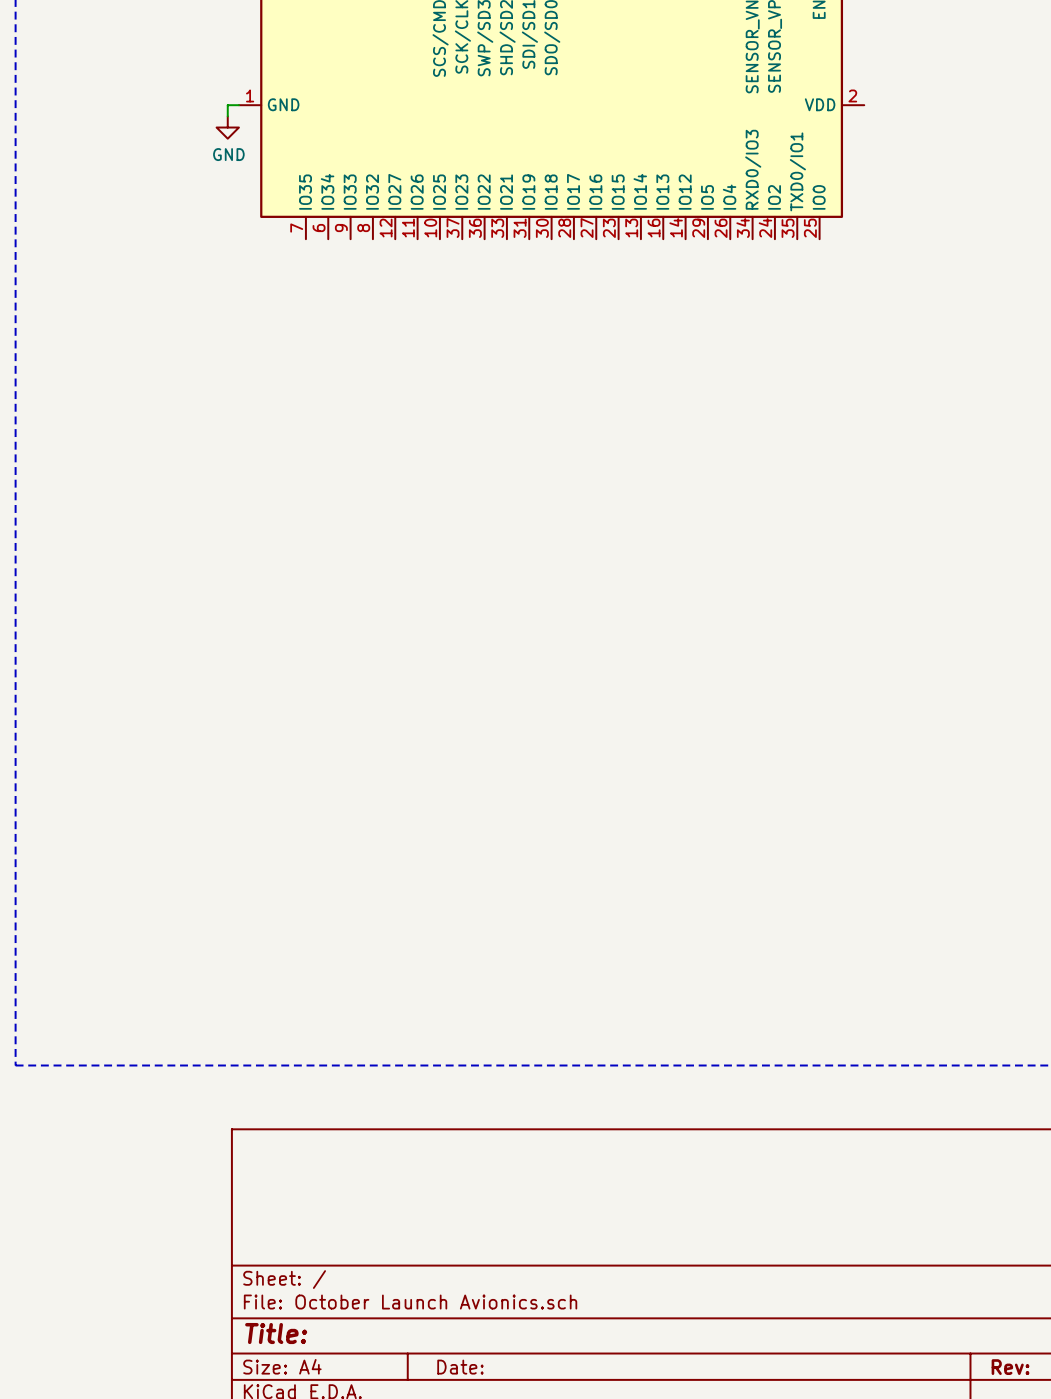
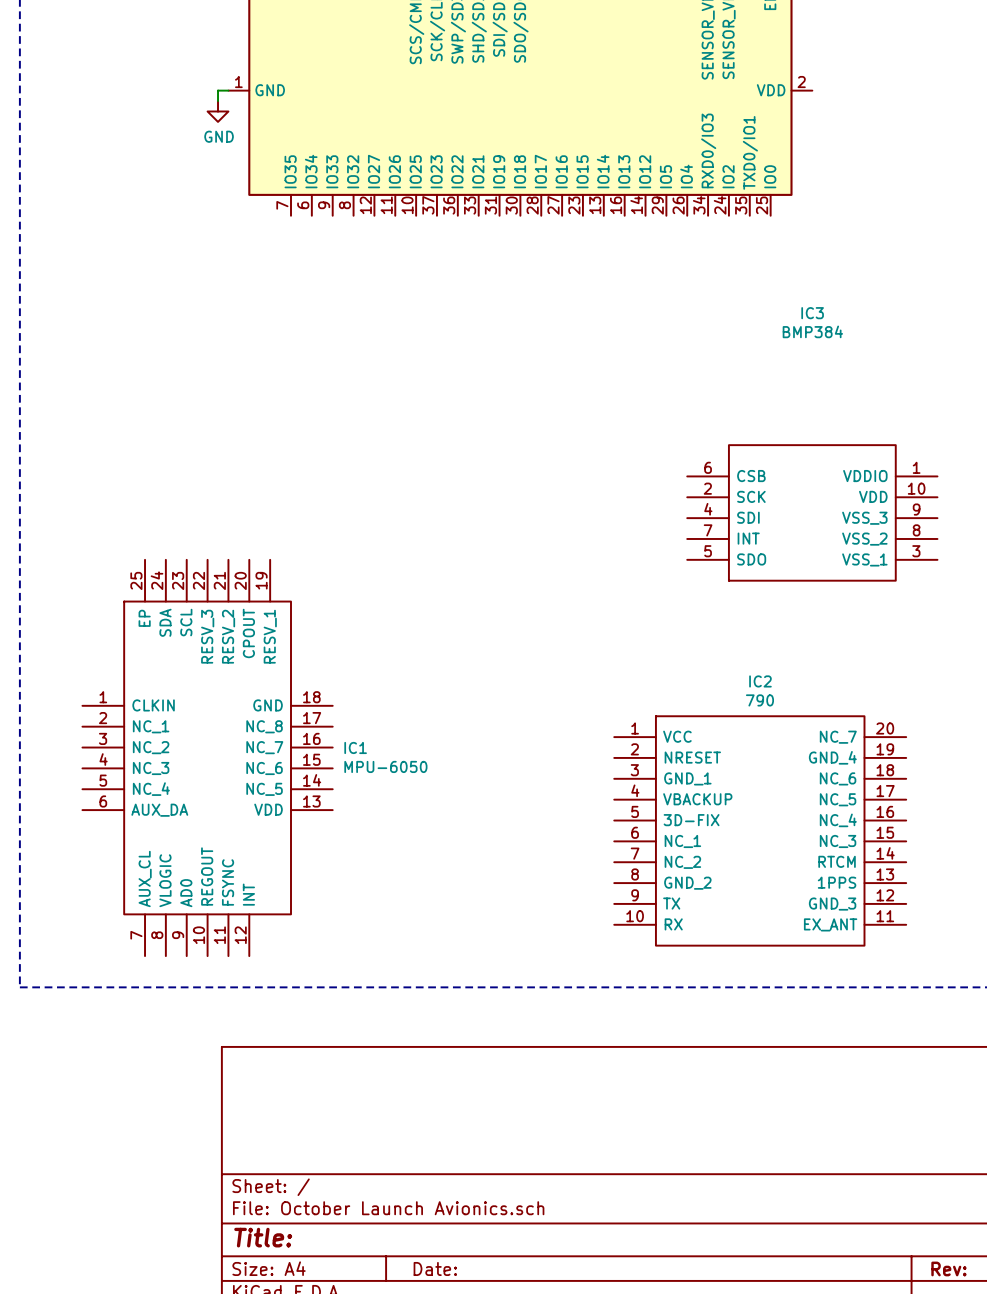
IC3: none -> BMP384 (812, 512)
IC1: none -> MPU-6050 (207, 757)
IC2: none -> 790 (760, 830)

